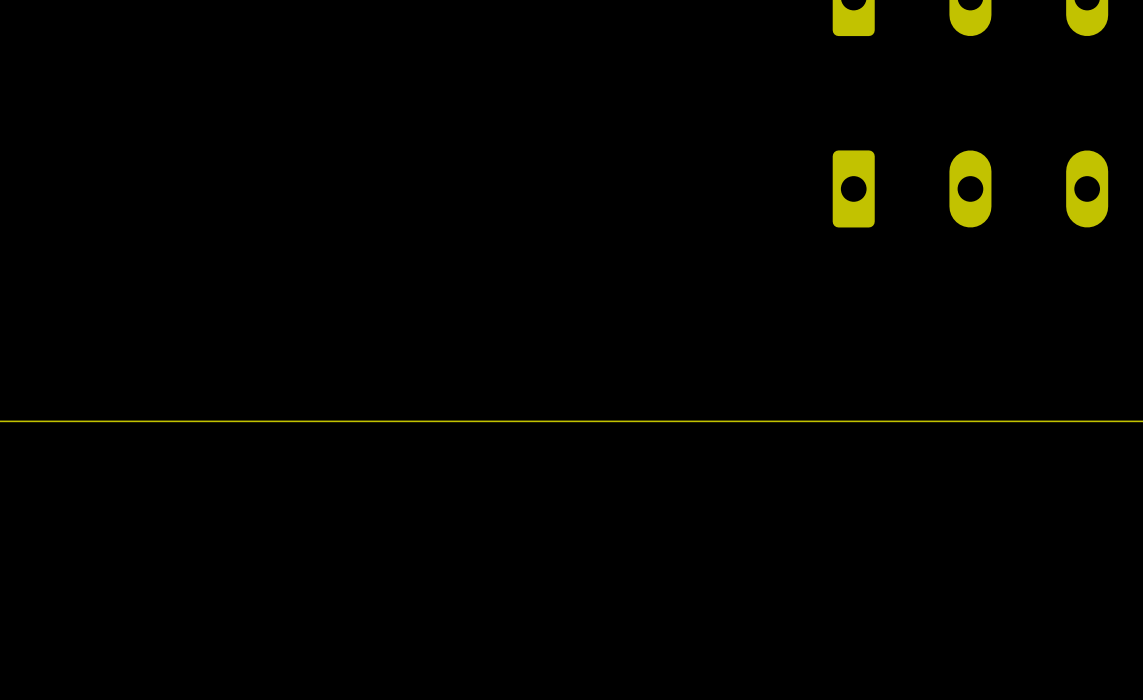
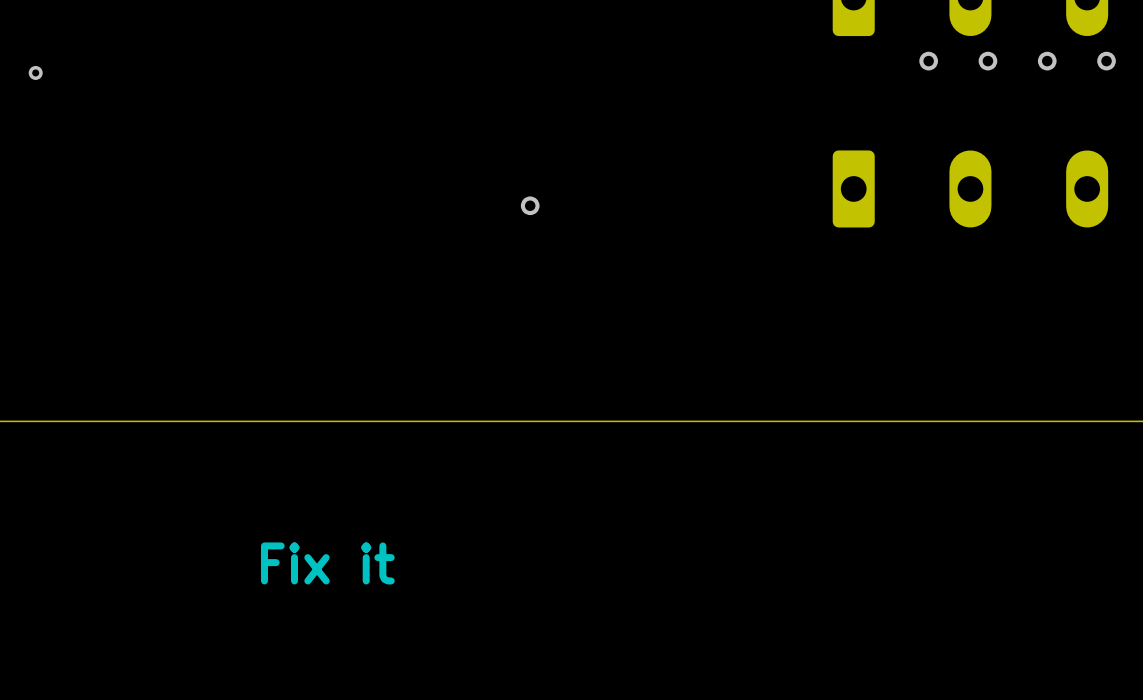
via: none -> (928, 61)
via: none -> (987, 61)
via: none -> (1047, 61)
via: none -> (1106, 61)
via: none -> (35, 72)
via: none -> (530, 205)
text: none -> Fix it (327, 563)

